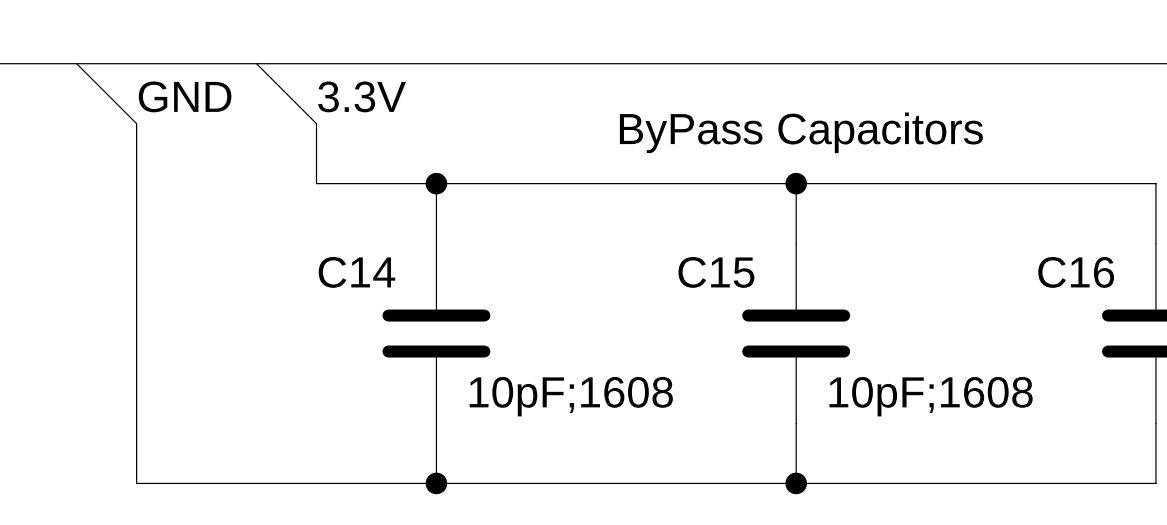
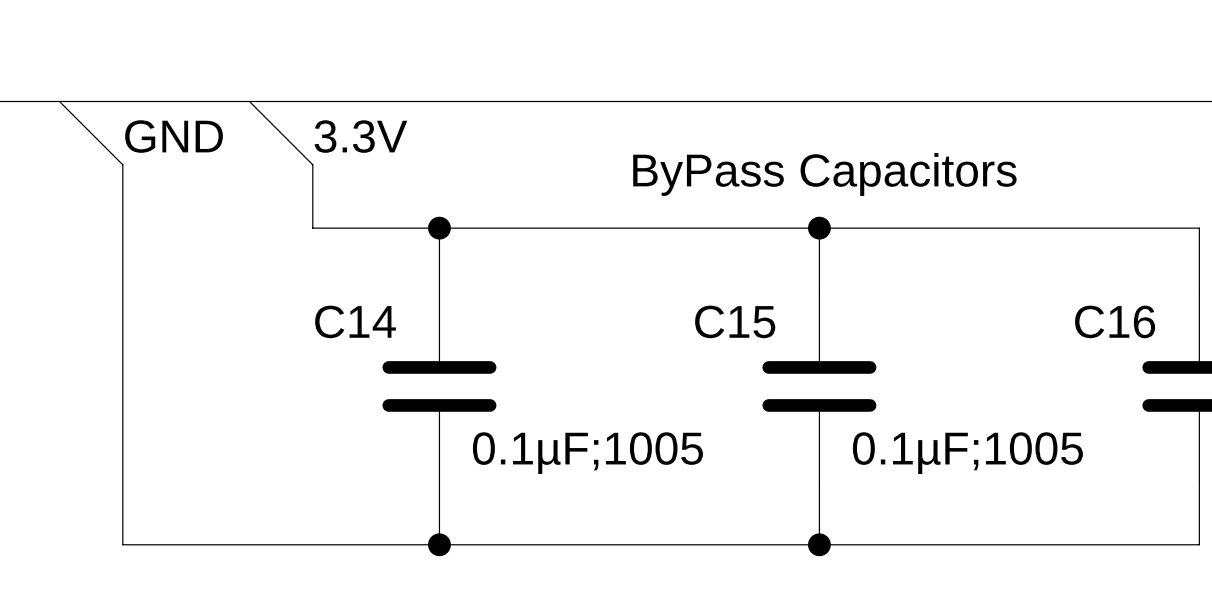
C14 value: 10pF;1608 (571, 396) -> 0.1µF;1005 (587, 453)
C15 value: 10pF;1608 (931, 396) -> 0.1µF;1005 (967, 453)

